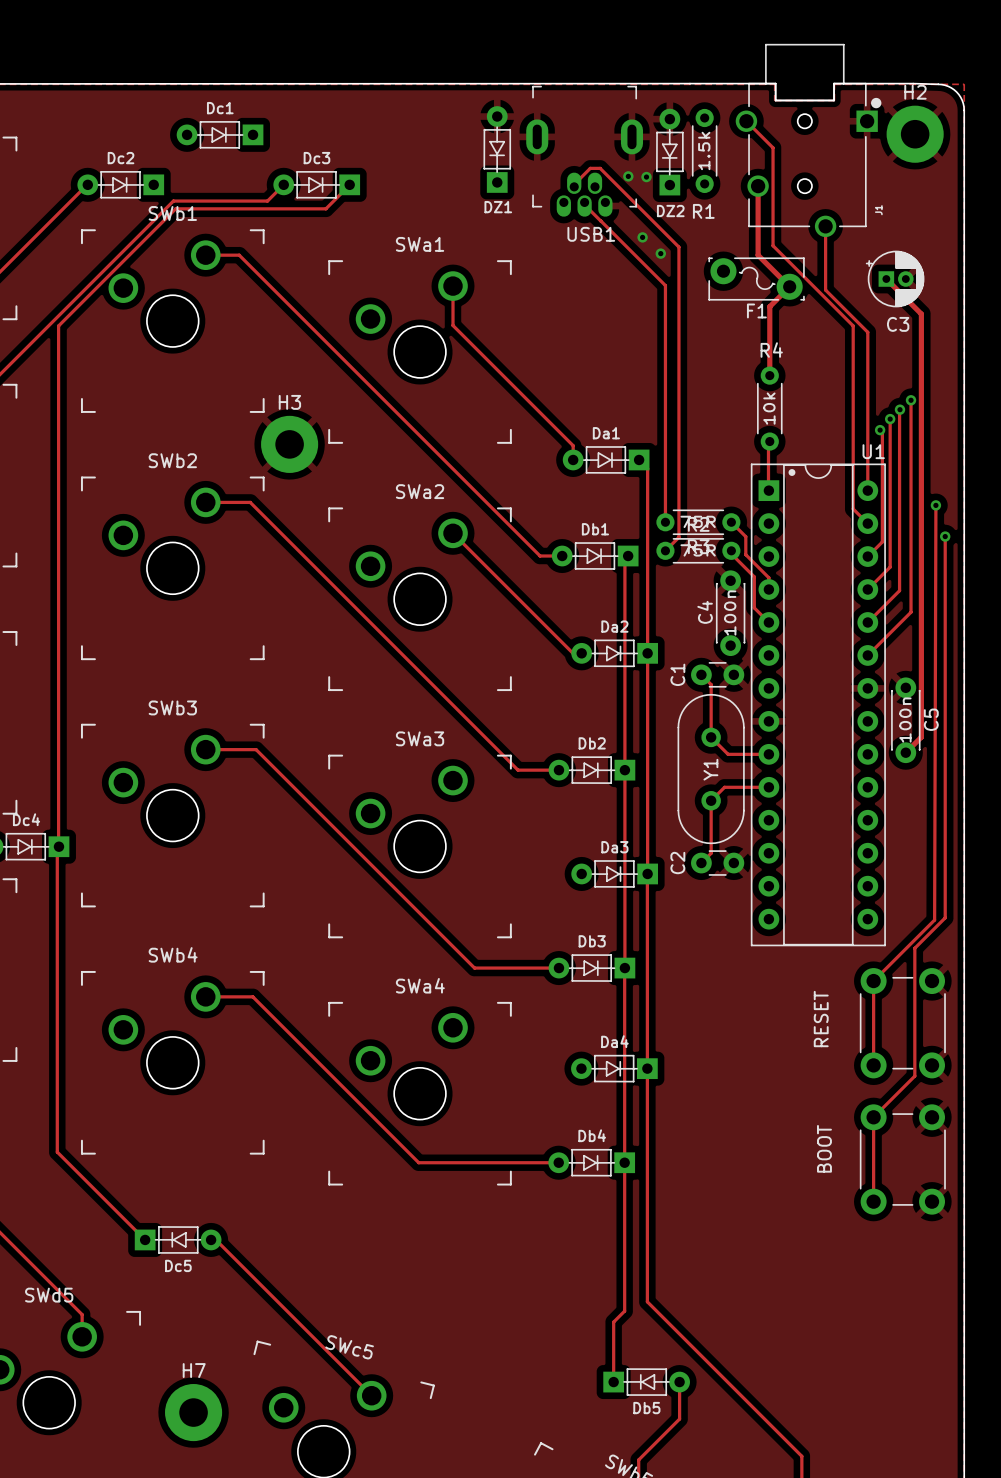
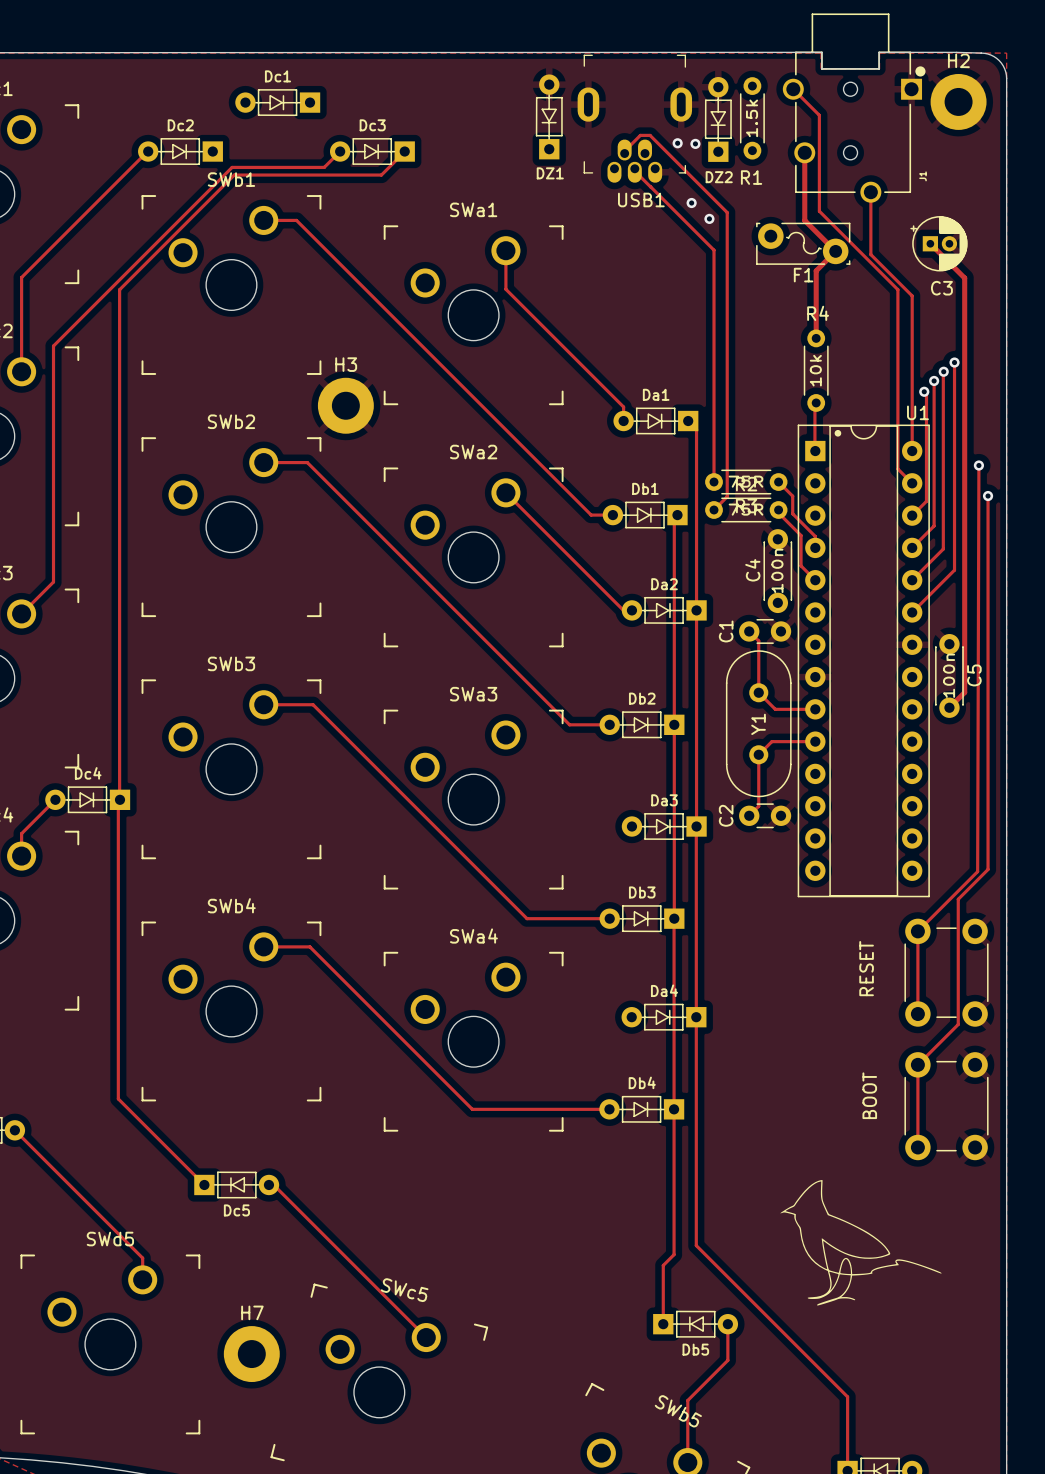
drawing: none -> [780, 1180, 942, 1306]

